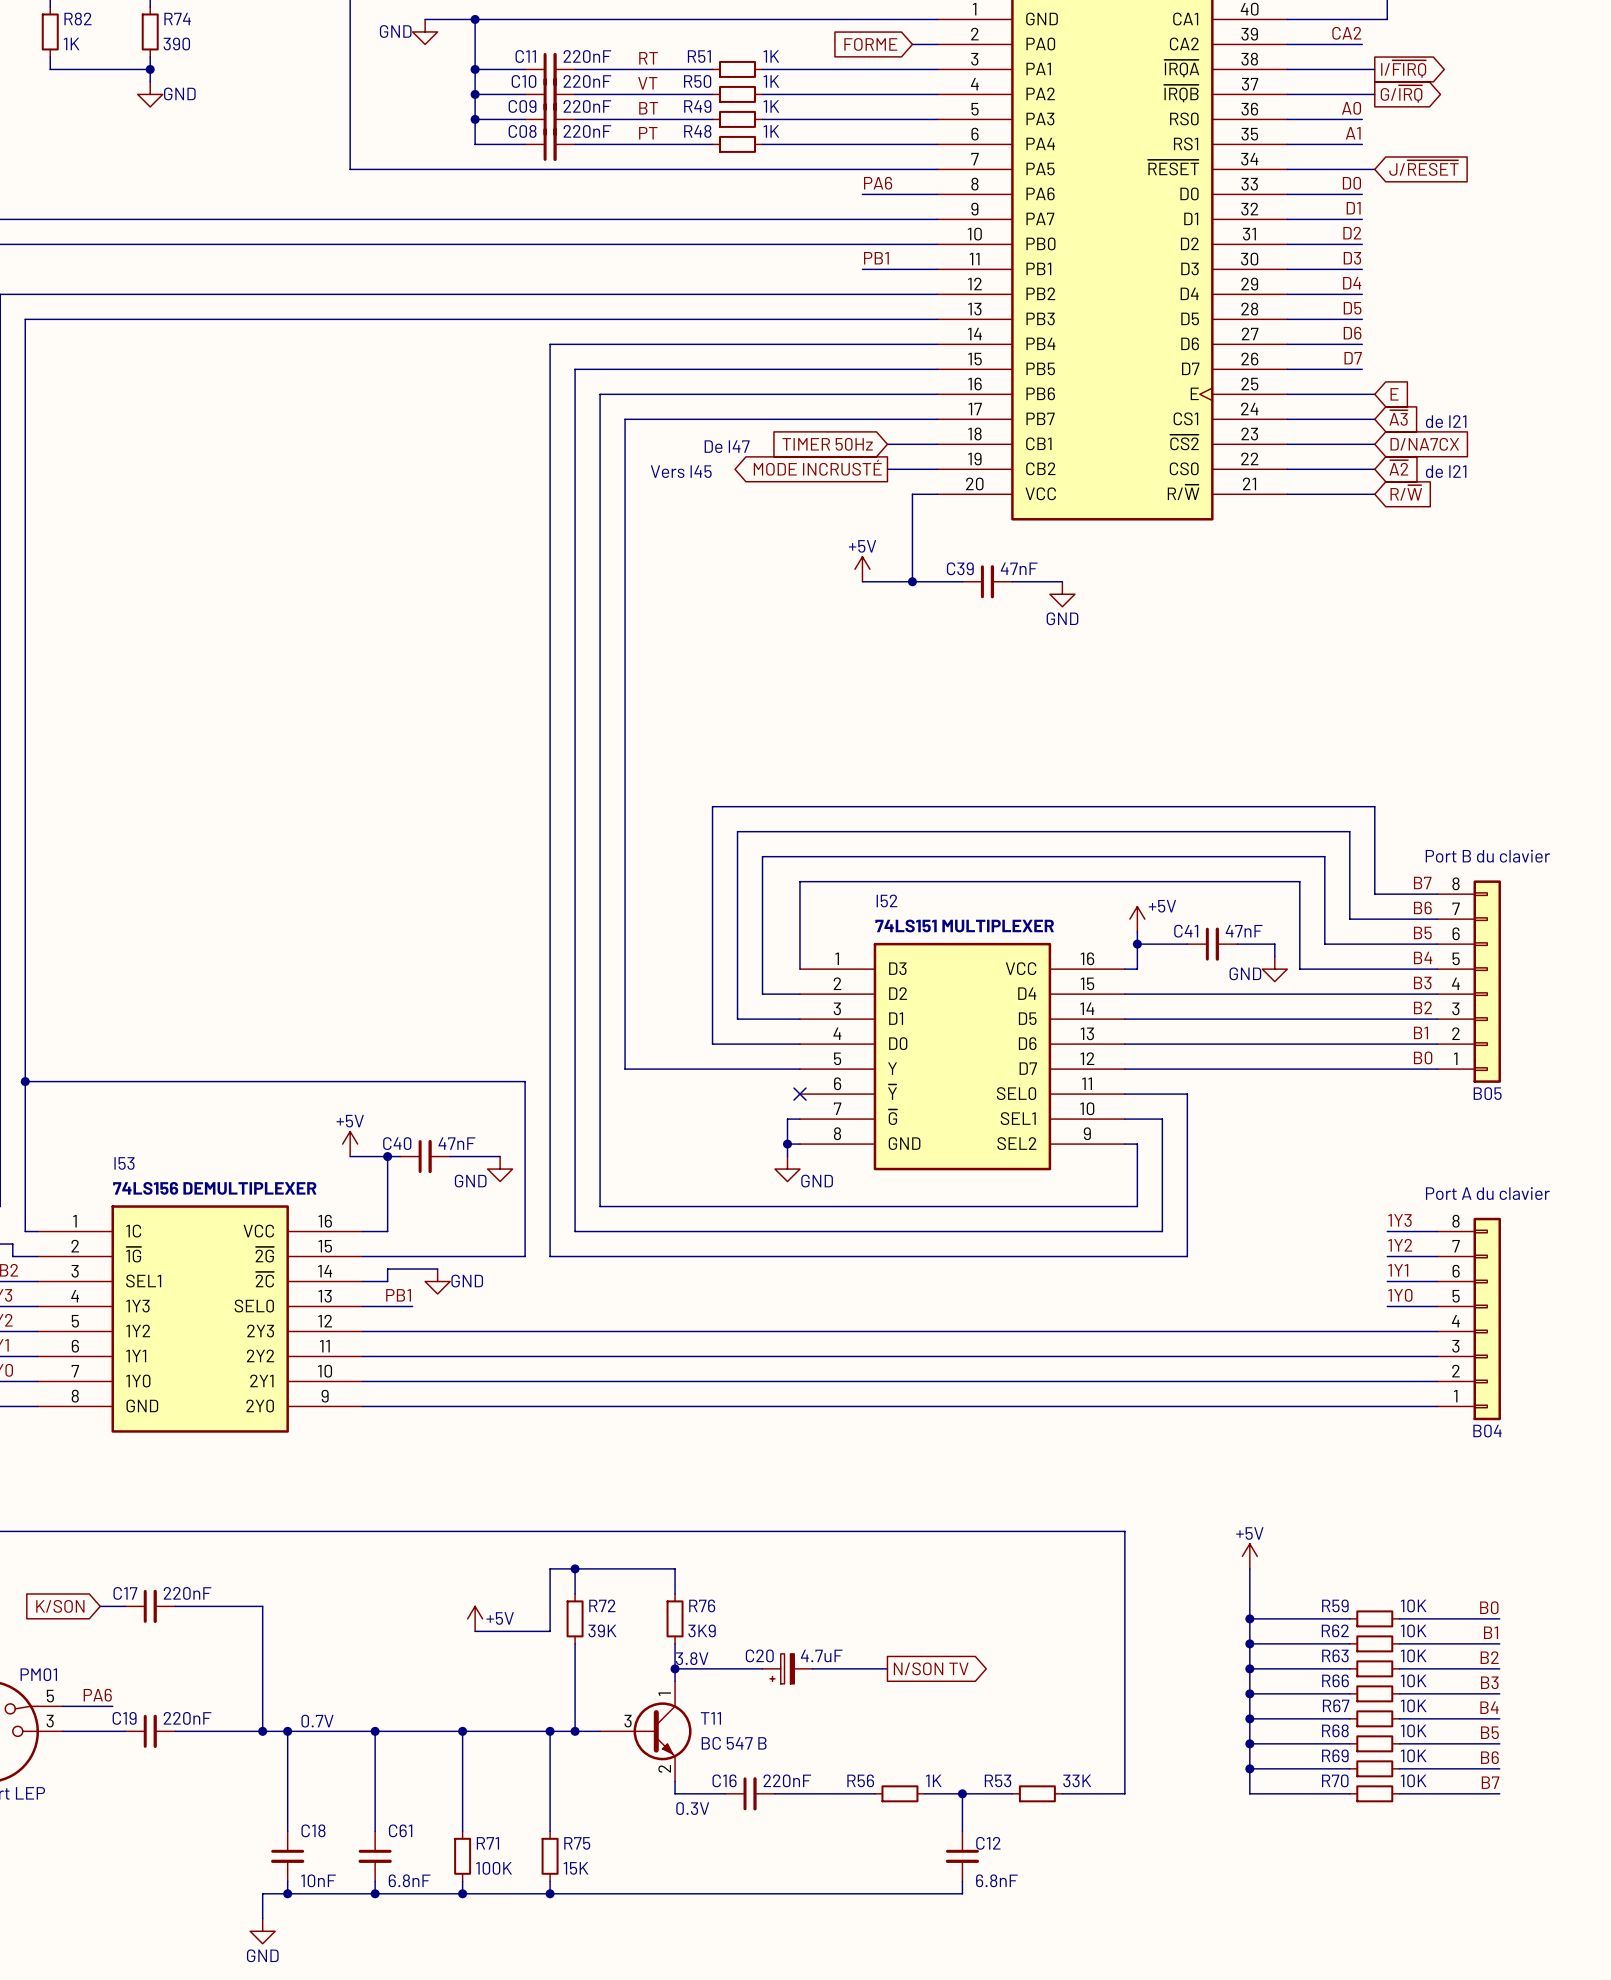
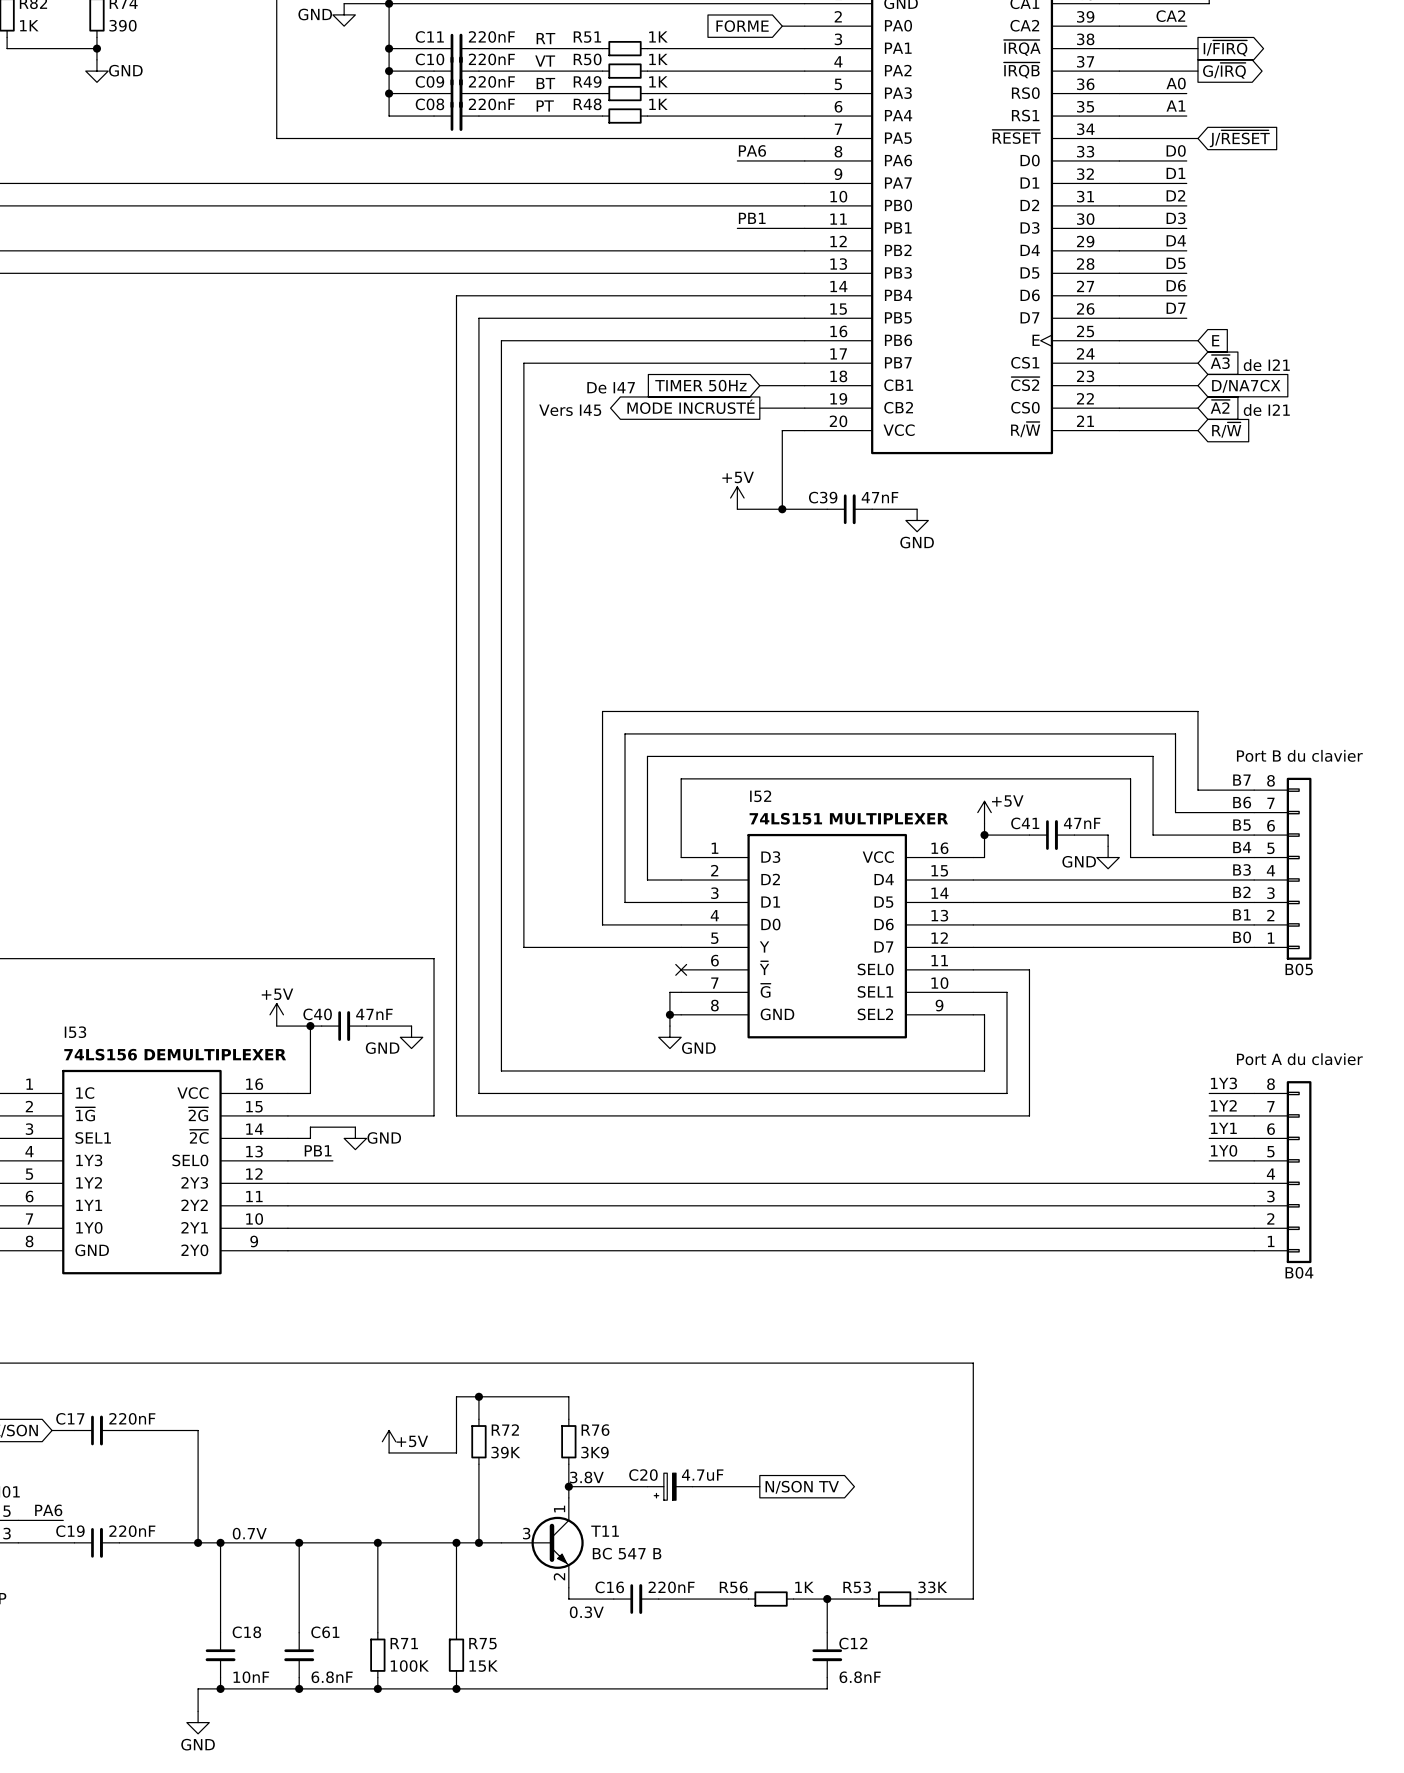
power symbol: +5V (1249, 1556) -> none
wire: (1249, 1568) (1249, 1793) (1349, 1793) -> none
label: B0 (1489, 1607) -> none
wire: (1249, 1618) (1349, 1618) -> none
junction: (1249, 1618) -> none
R59: 10K (1374, 1618) -> none
wire: (1399, 1618) (1499, 1618) -> none
label: B1 (1491, 1632) -> none
wire: (1249, 1643) (1349, 1643) -> none
junction: (1249, 1643) -> none
R62: 10K (1374, 1643) -> none
wire: (1399, 1643) (1499, 1643) -> none
label: B2 (1489, 1657) -> none
wire: (1249, 1668) (1349, 1668) -> none
junction: (1249, 1668) -> none
R63: 10K (1374, 1668) -> none
wire: (1399, 1668) (1499, 1668) -> none
label: B3 (1489, 1682) -> none
wire: (1249, 1693) (1349, 1693) -> none
junction: (1249, 1693) -> none
R66: 10K (1374, 1693) -> none
wire: (1399, 1693) (1499, 1693) -> none
label: B4 (1489, 1707) -> none
wire: (1249, 1718) (1349, 1718) -> none
junction: (1249, 1718) -> none
R67: 10K (1374, 1718) -> none
wire: (1399, 1718) (1499, 1718) -> none
label: B5 (1489, 1732) -> none
wire: (1249, 1743) (1349, 1743) -> none
junction: (1249, 1743) -> none
R68: 10K (1374, 1743) -> none
wire: (1399, 1743) (1499, 1743) -> none
label: B6 (1489, 1757) -> none
wire: (1249, 1768) (1349, 1768) -> none
junction: (1249, 1768) -> none
R69: 10K (1374, 1768) -> none
wire: (1399, 1768) (1499, 1768) -> none
label: B7 (1490, 1782) -> none
R70: 10K (1374, 1793) -> none
wire: (1399, 1793) (1499, 1793) -> none

